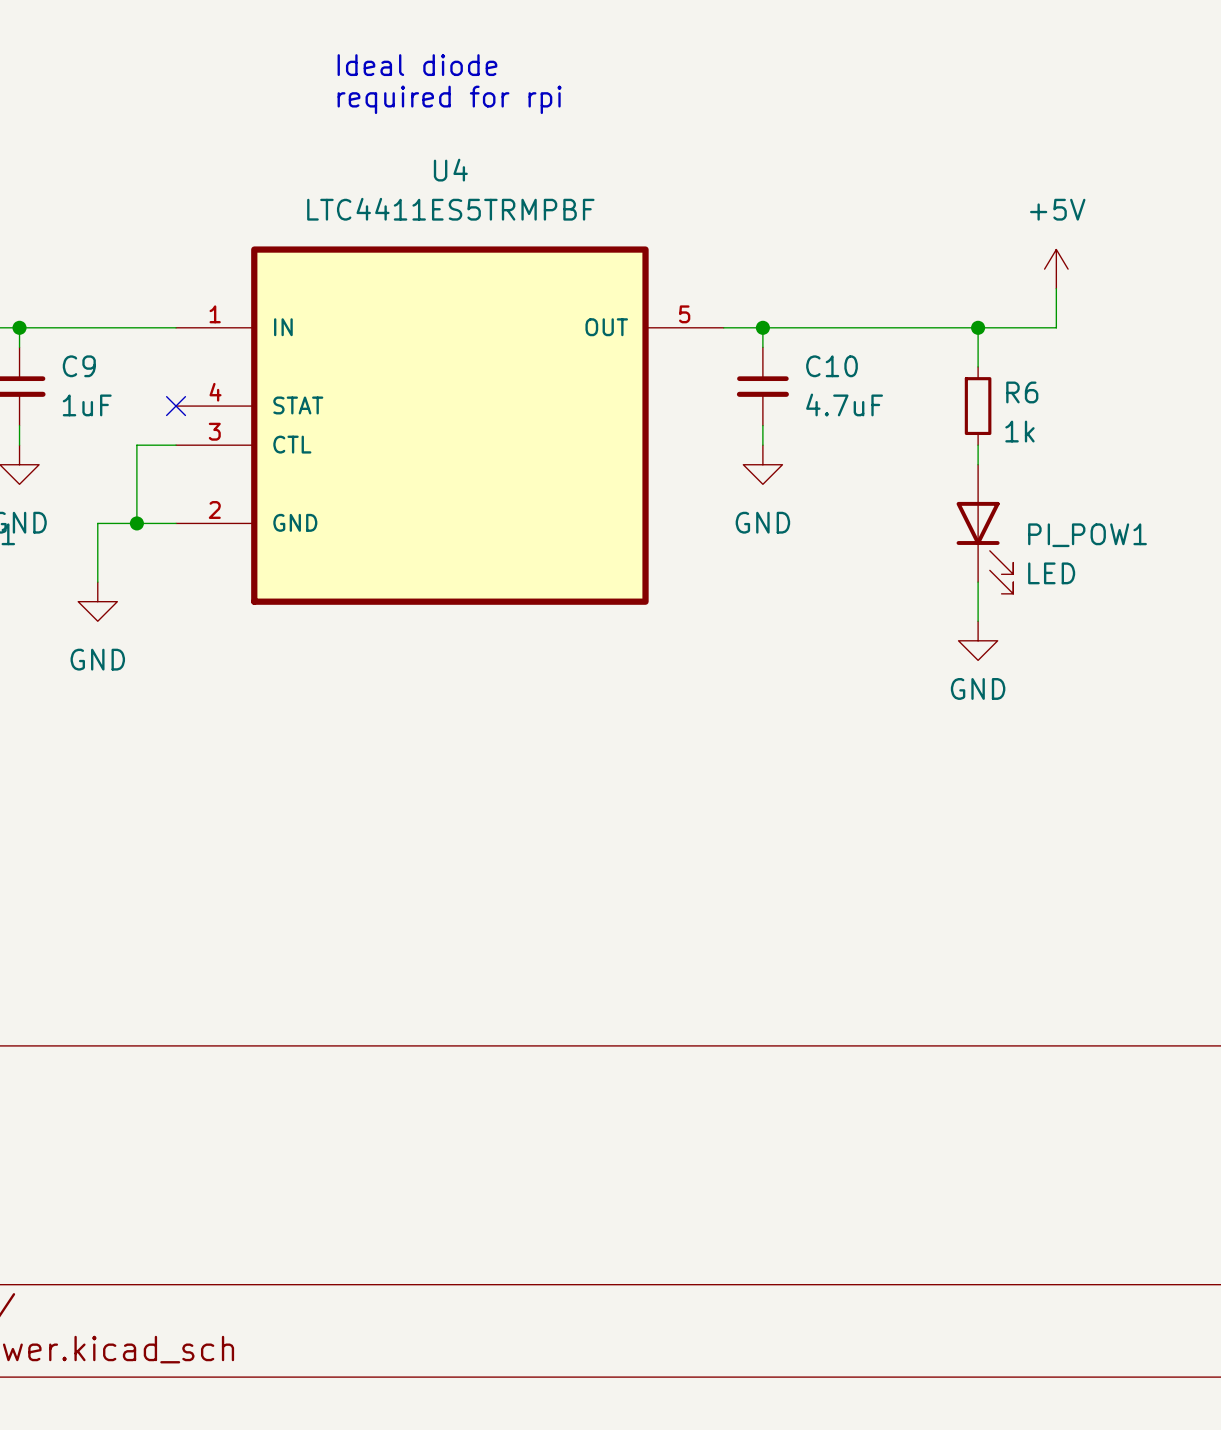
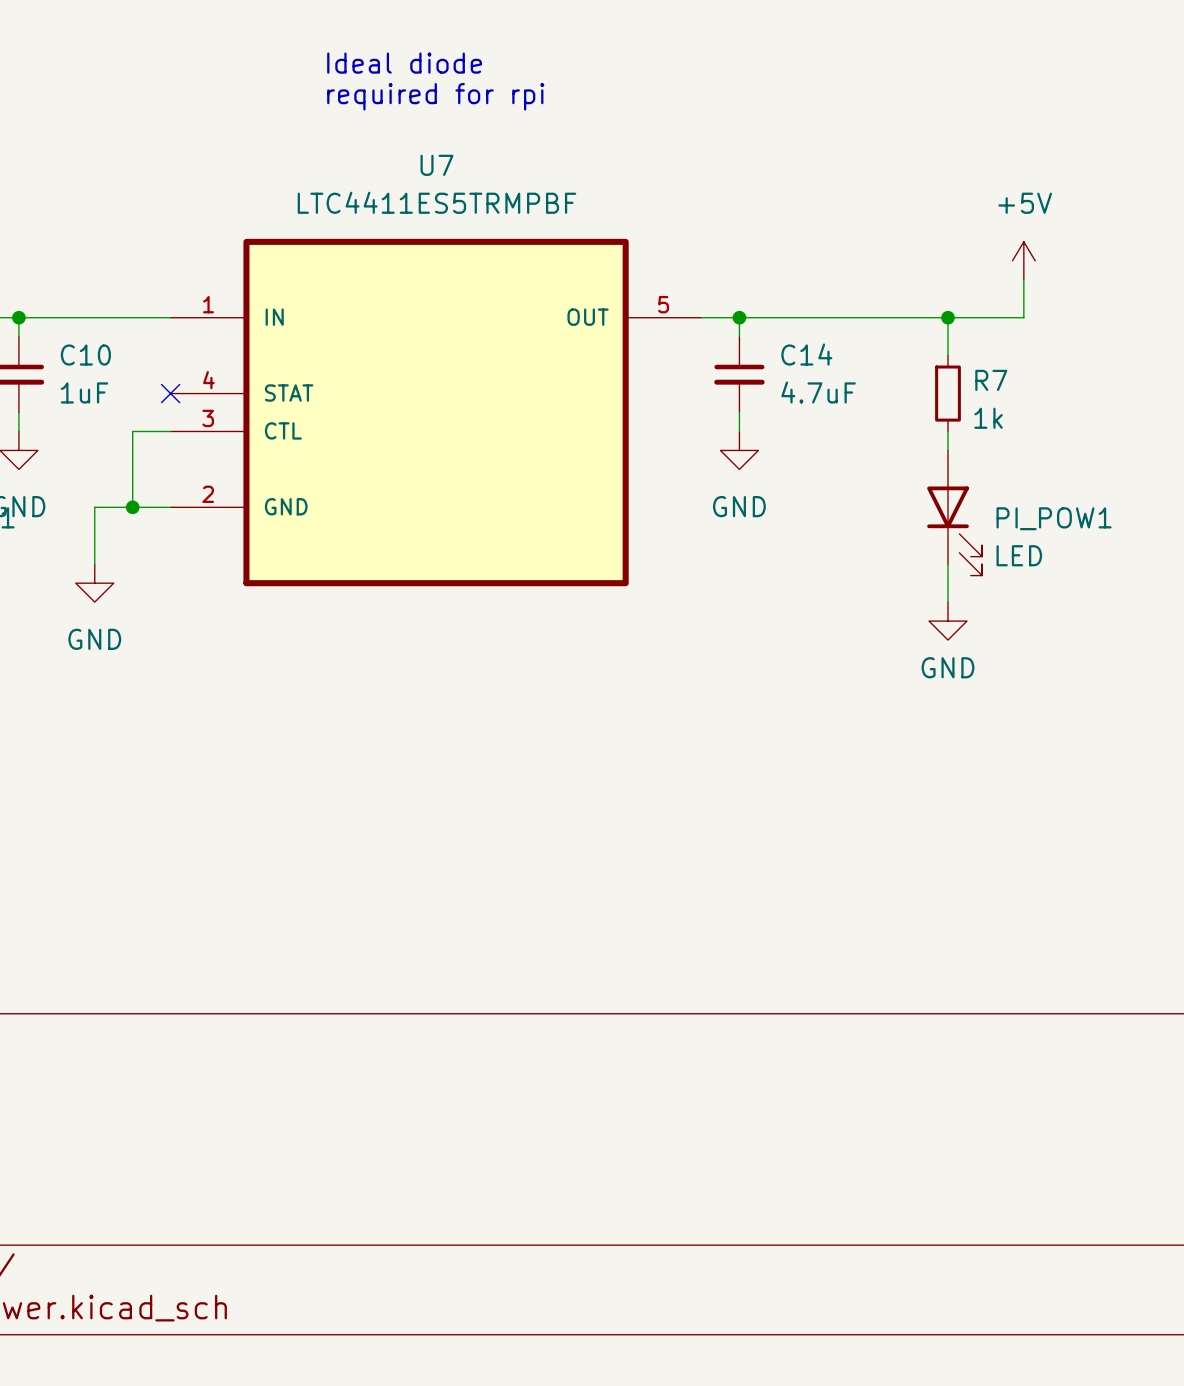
U4 name: U4 (450, 170) -> U7 (436, 165)
C9 name: C9 (79, 366) -> C10 (85, 355)
C10 name: C10 (831, 366) -> C14 (806, 354)
R6 name: R6 (1022, 392) -> R7 (991, 380)

